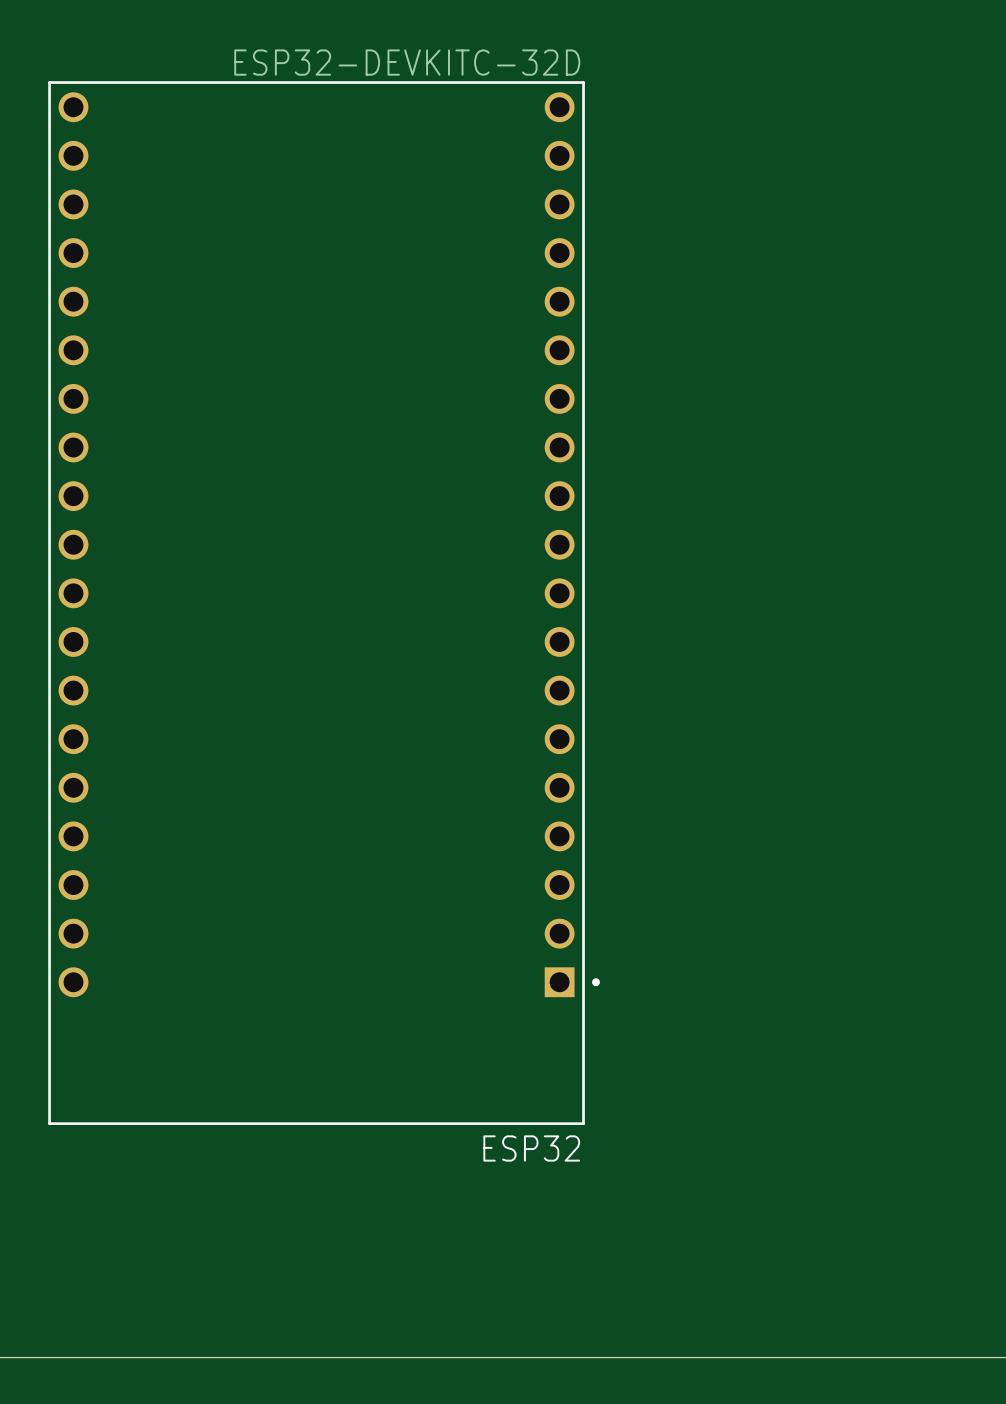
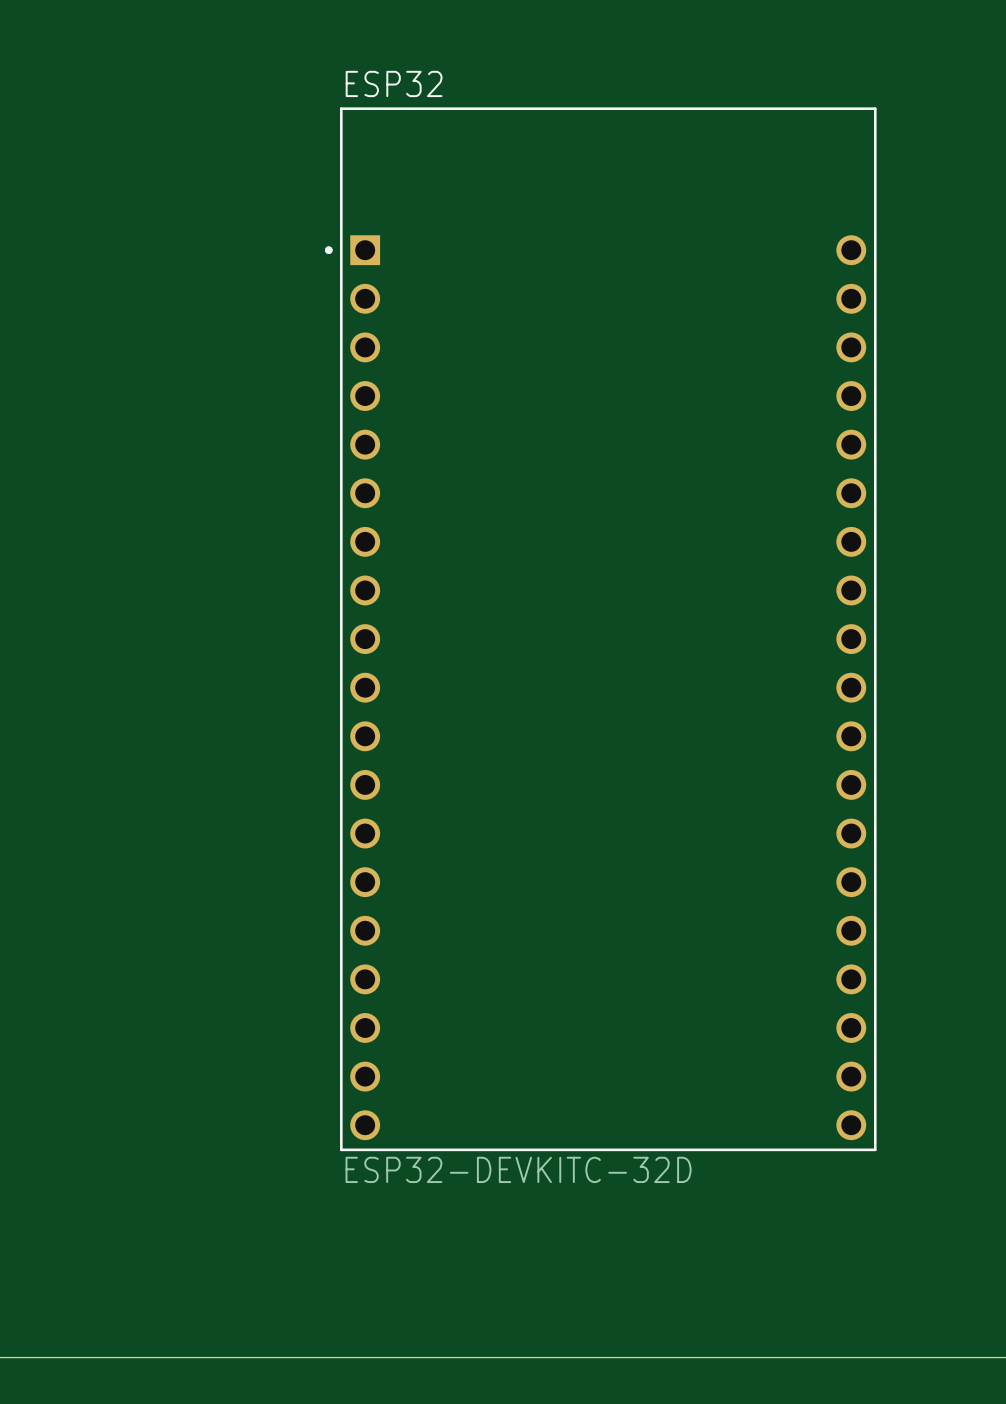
ESP32 rotation: 0° (324, 603) -> 180° (600, 629)

